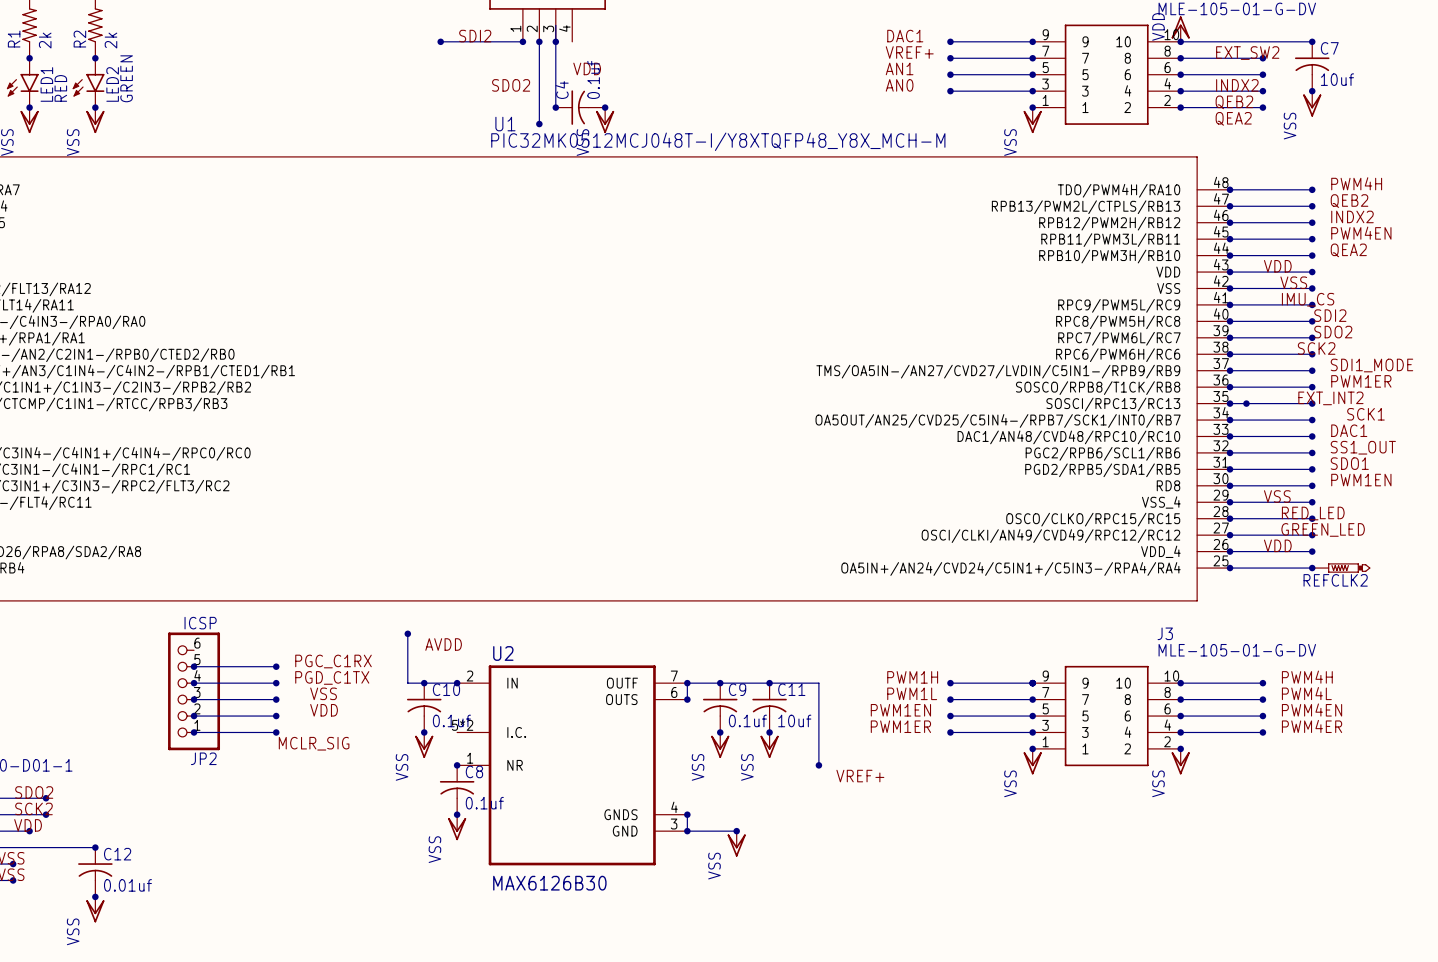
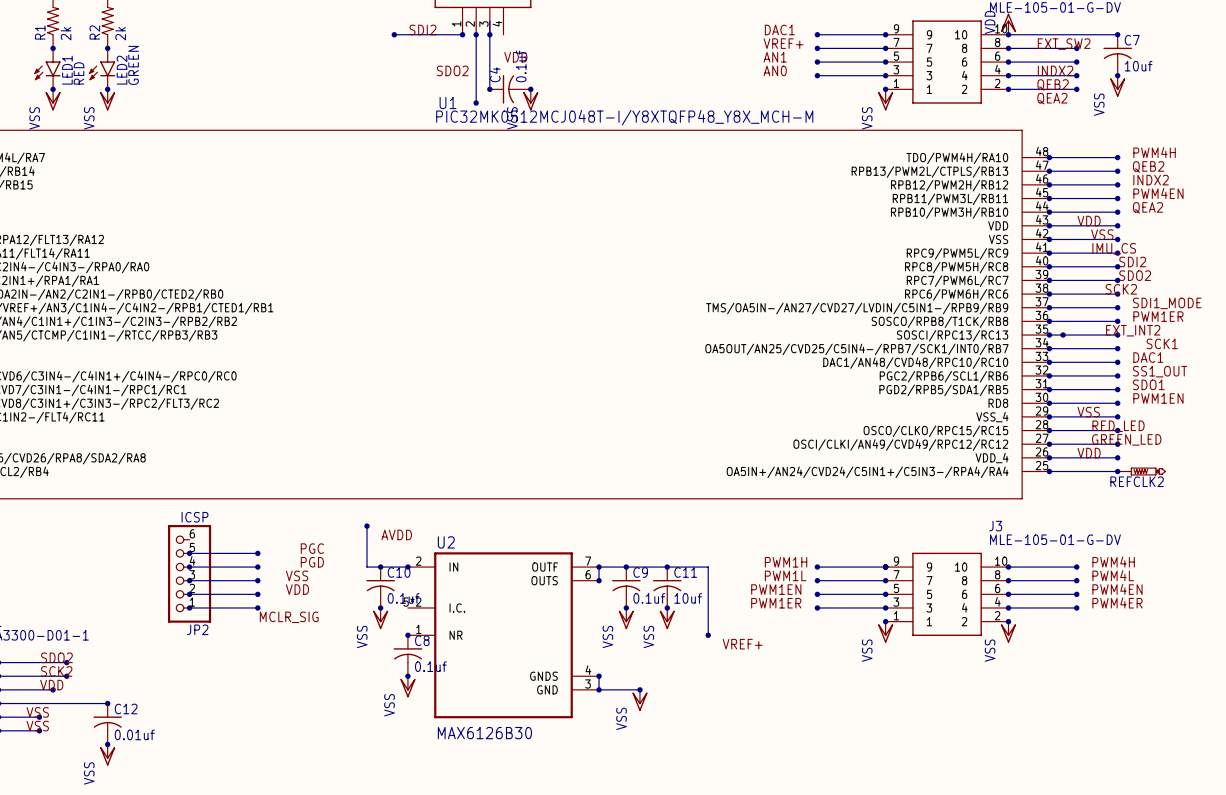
label: none -> PGC (312, 548)
label: PGC_C1RX (333, 661) -> none
label: PGD_C1TX (332, 677) -> none
label: none -> PGD (312, 562)

